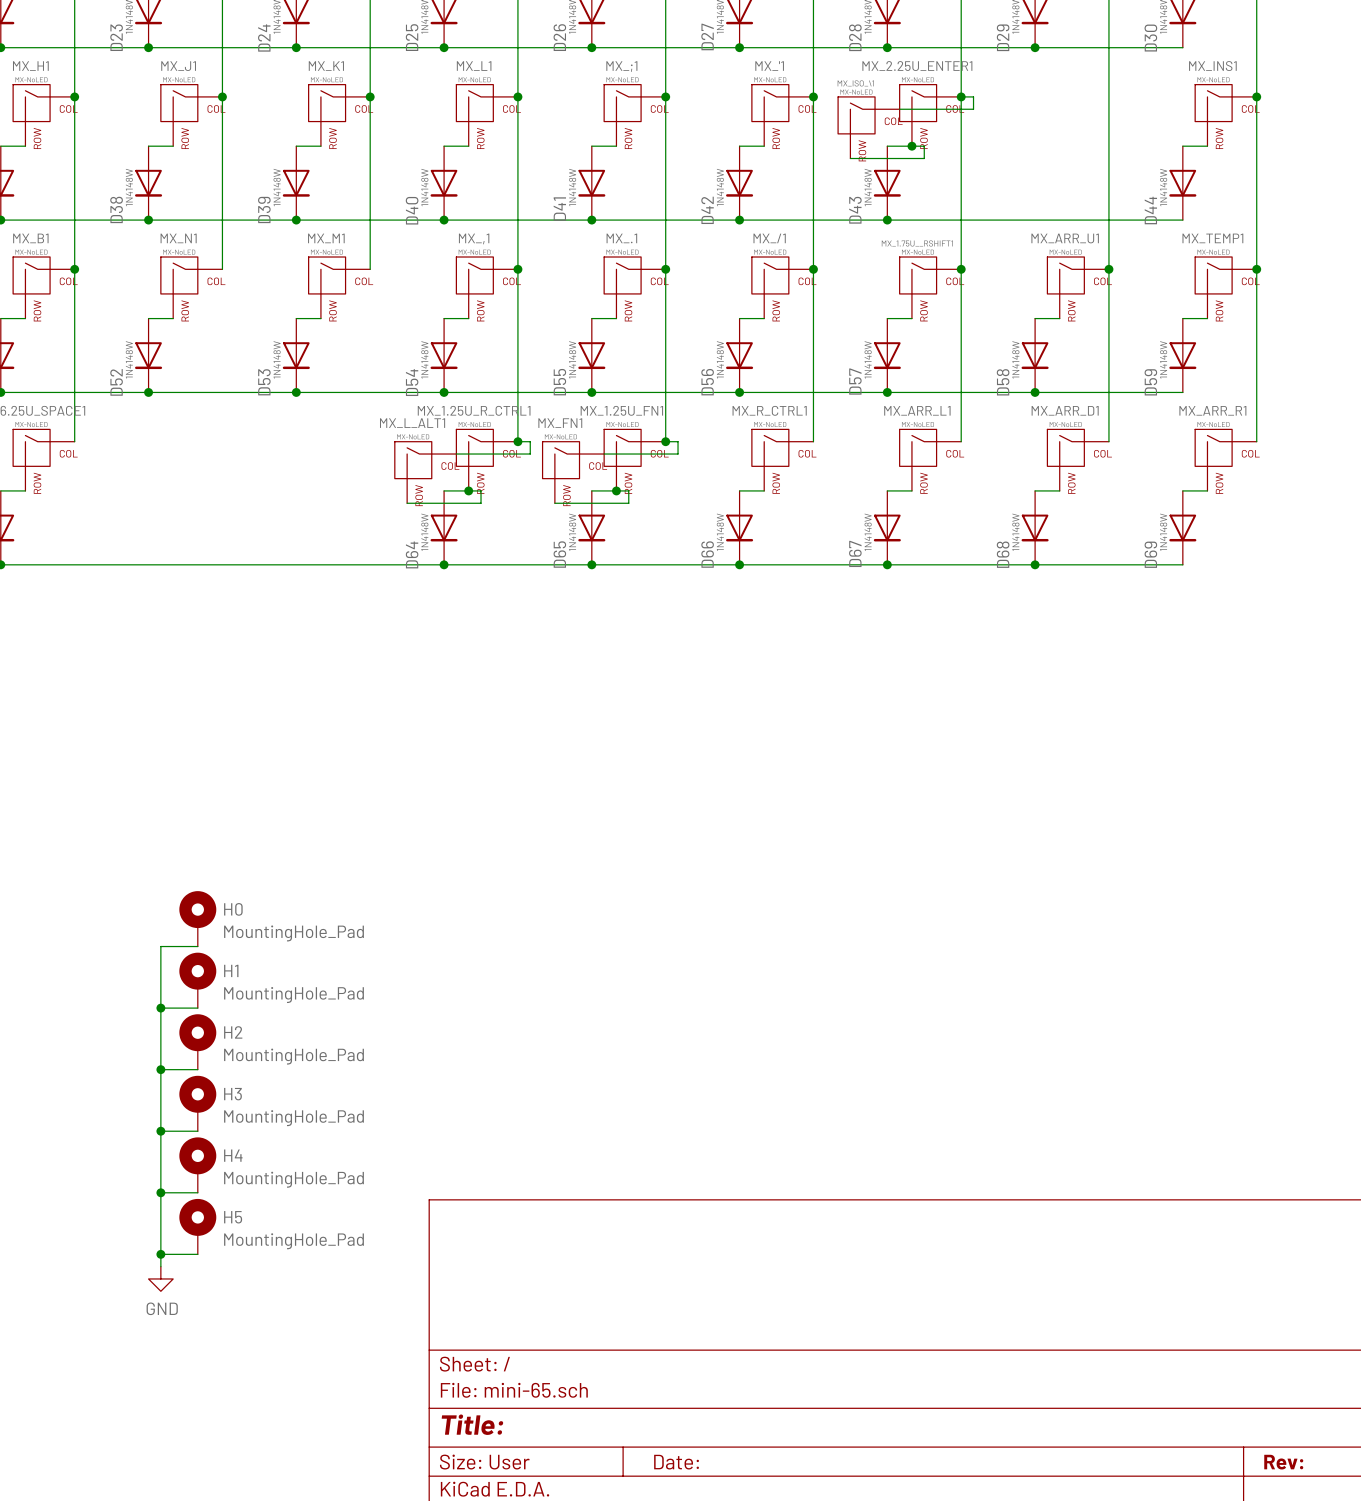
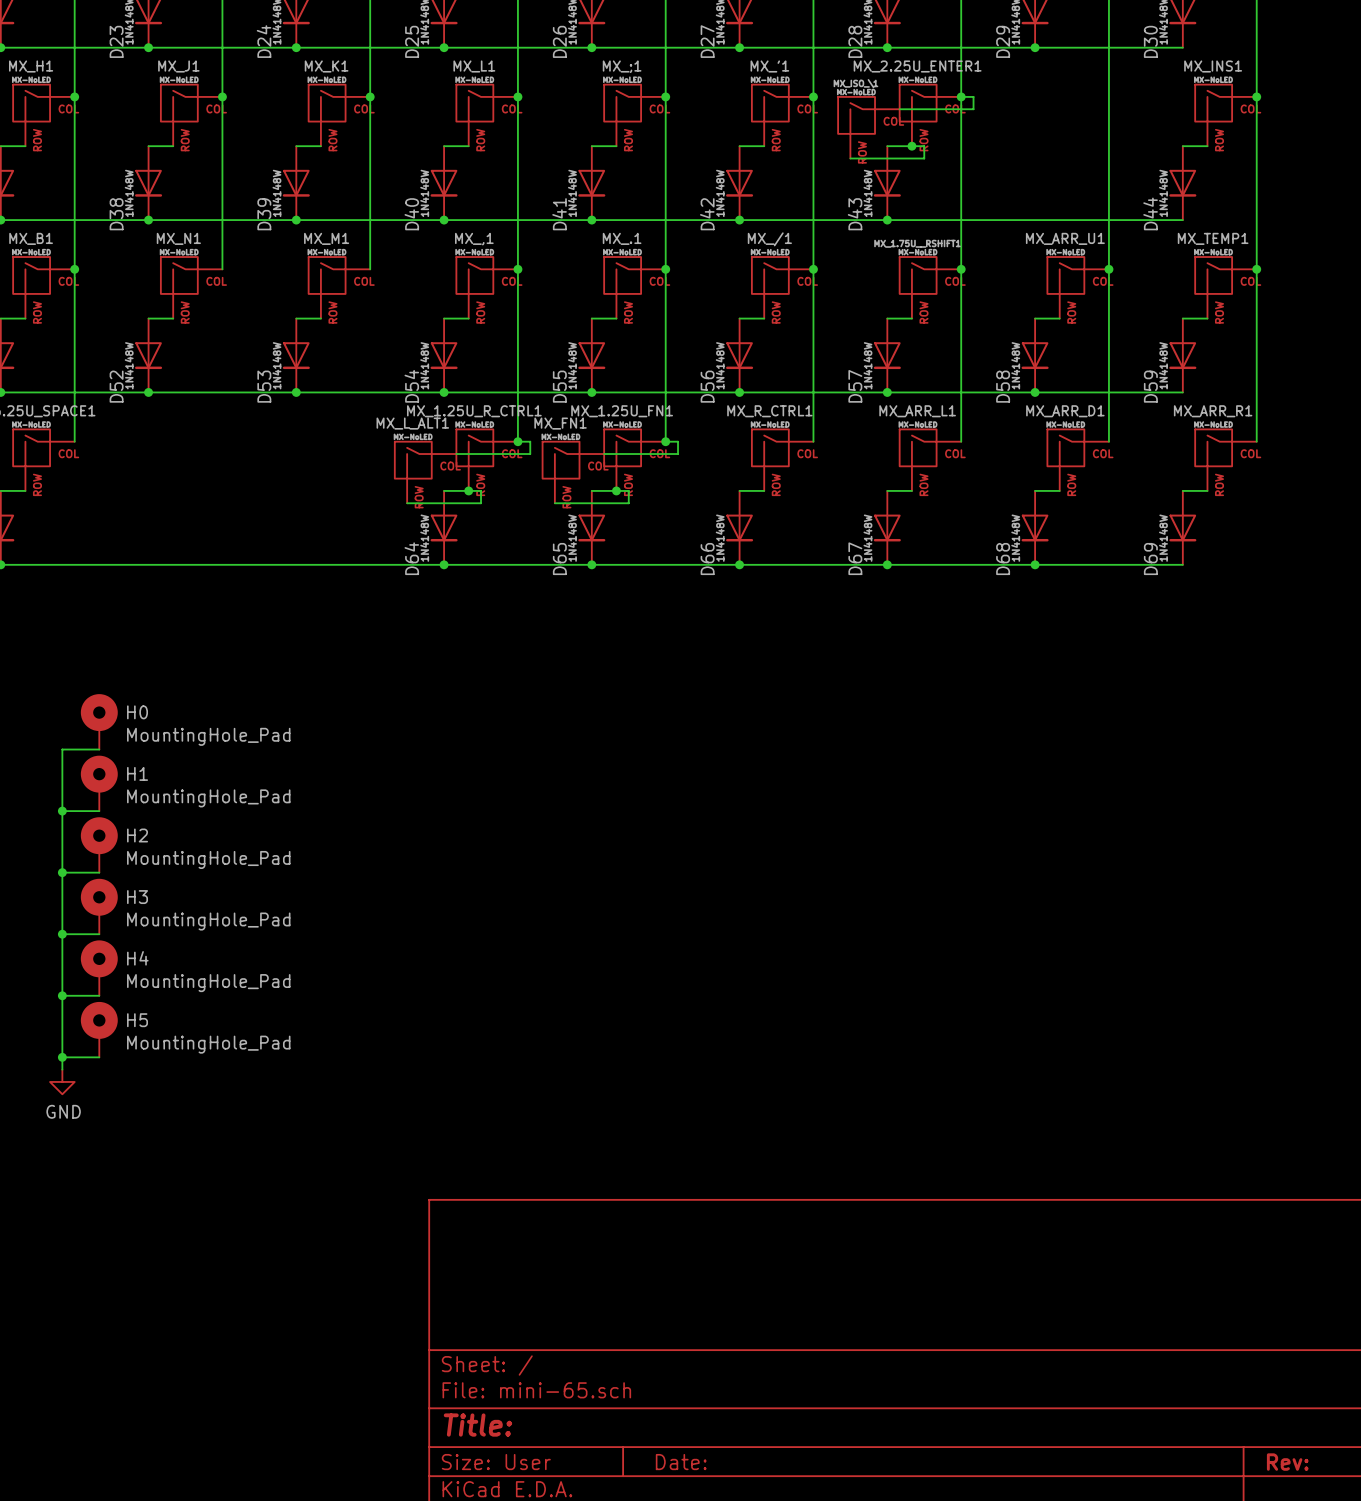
junction: none -> (62, 811)
junction: none -> (62, 872)
H0 position: (197, 918) -> (99, 721)
junction: none -> (62, 934)
wire: (197, 946) (160, 946) (160, 1266) -> (99, 749) (62, 749) (62, 1069)
H1 position: (197, 980) -> (99, 783)
junction: none -> (62, 995)
wire: (160, 1008) (197, 1008) -> (62, 811) (99, 811)
junction: (160, 1008) -> none
H2 position: (197, 1041) -> (99, 844)
junction: none -> (62, 1057)
wire: (160, 1069) (197, 1069) -> (62, 872) (99, 872)
junction: (160, 1069) -> none
H3 position: (197, 1103) -> (99, 906)
wire: (160, 1131) (197, 1131) -> (62, 934) (99, 934)
junction: (160, 1131) -> none
H4 position: (197, 1165) -> (99, 968)
wire: (160, 1192) (197, 1192) -> (62, 995) (99, 995)
junction: (160, 1192) -> none
H5 position: (197, 1226) -> (99, 1029)
wire: (160, 1254) (197, 1254) -> (62, 1057) (99, 1057)
junction: (160, 1254) -> none
power symbol position: GND (160, 1278) -> GND (62, 1081)

